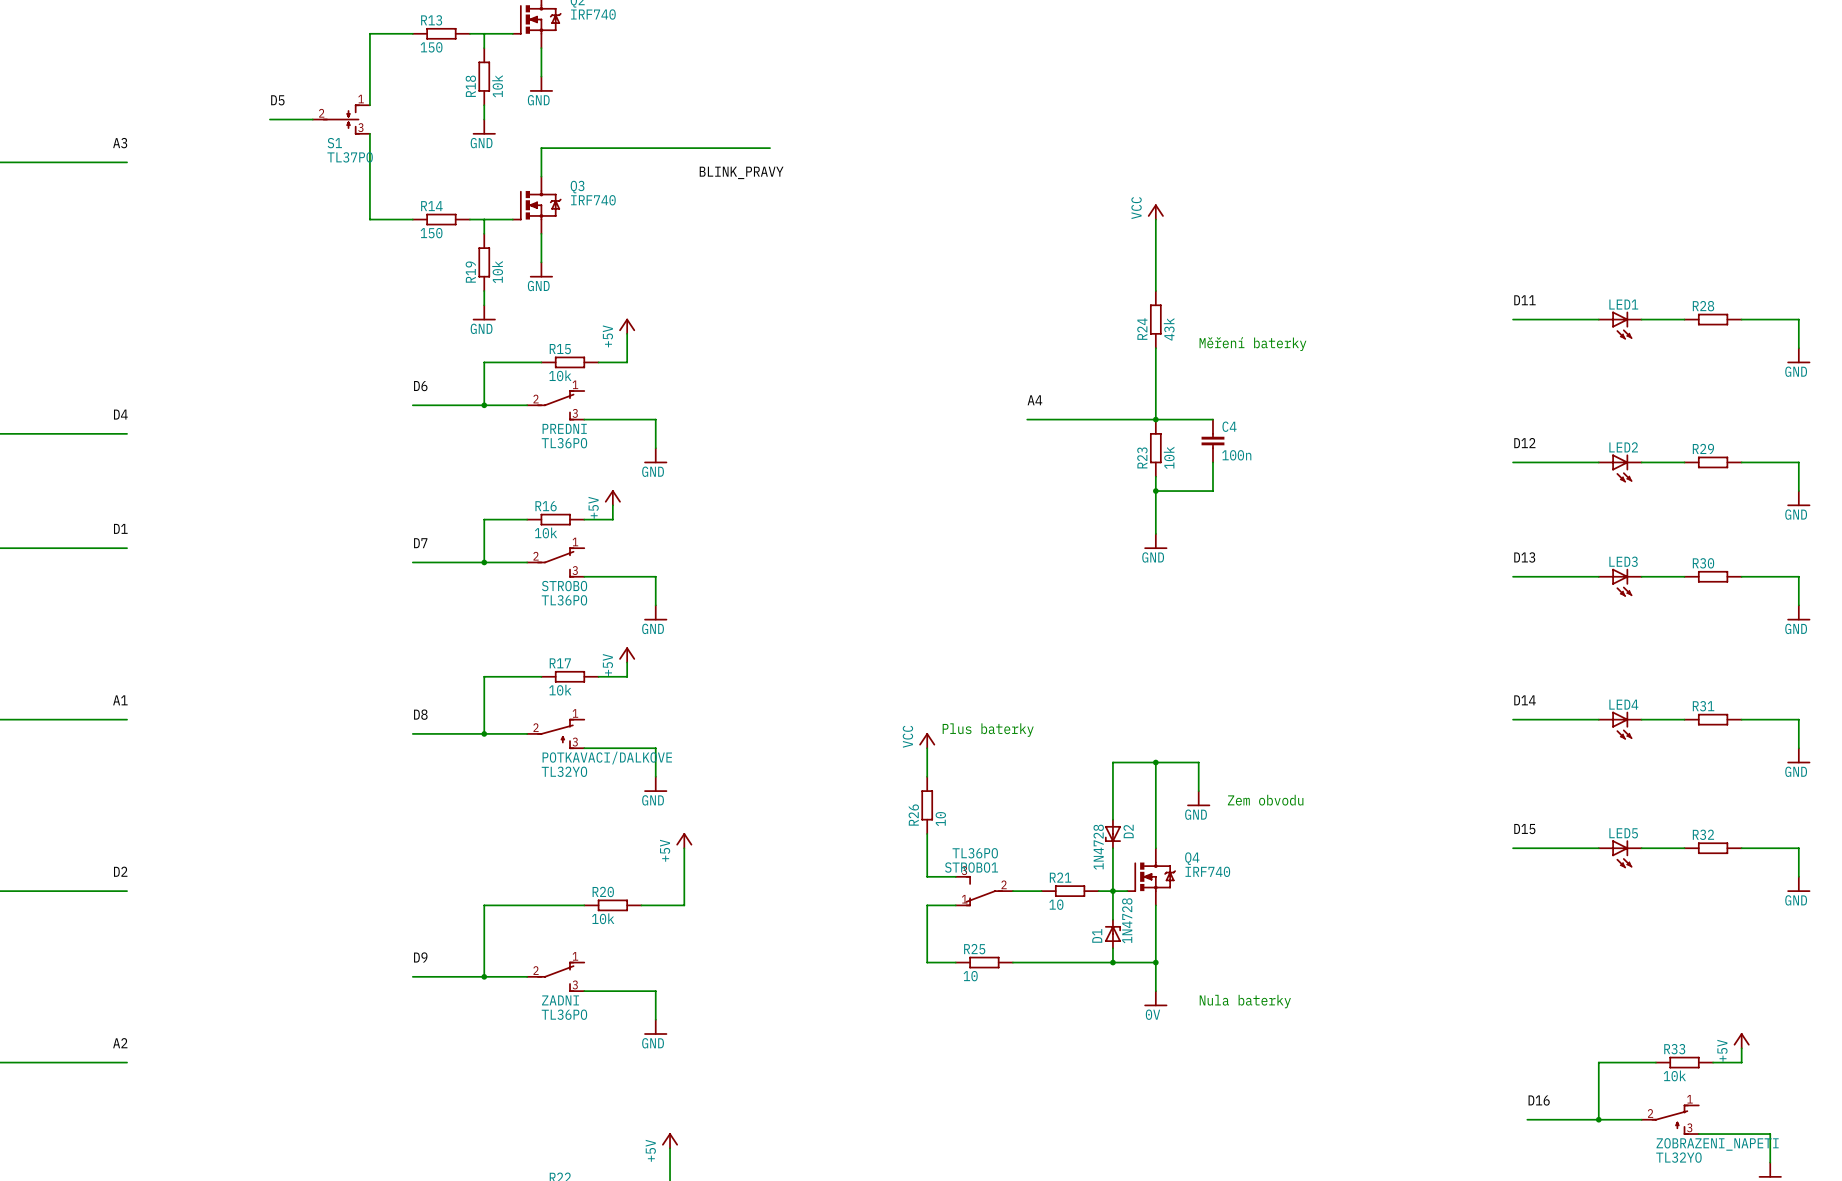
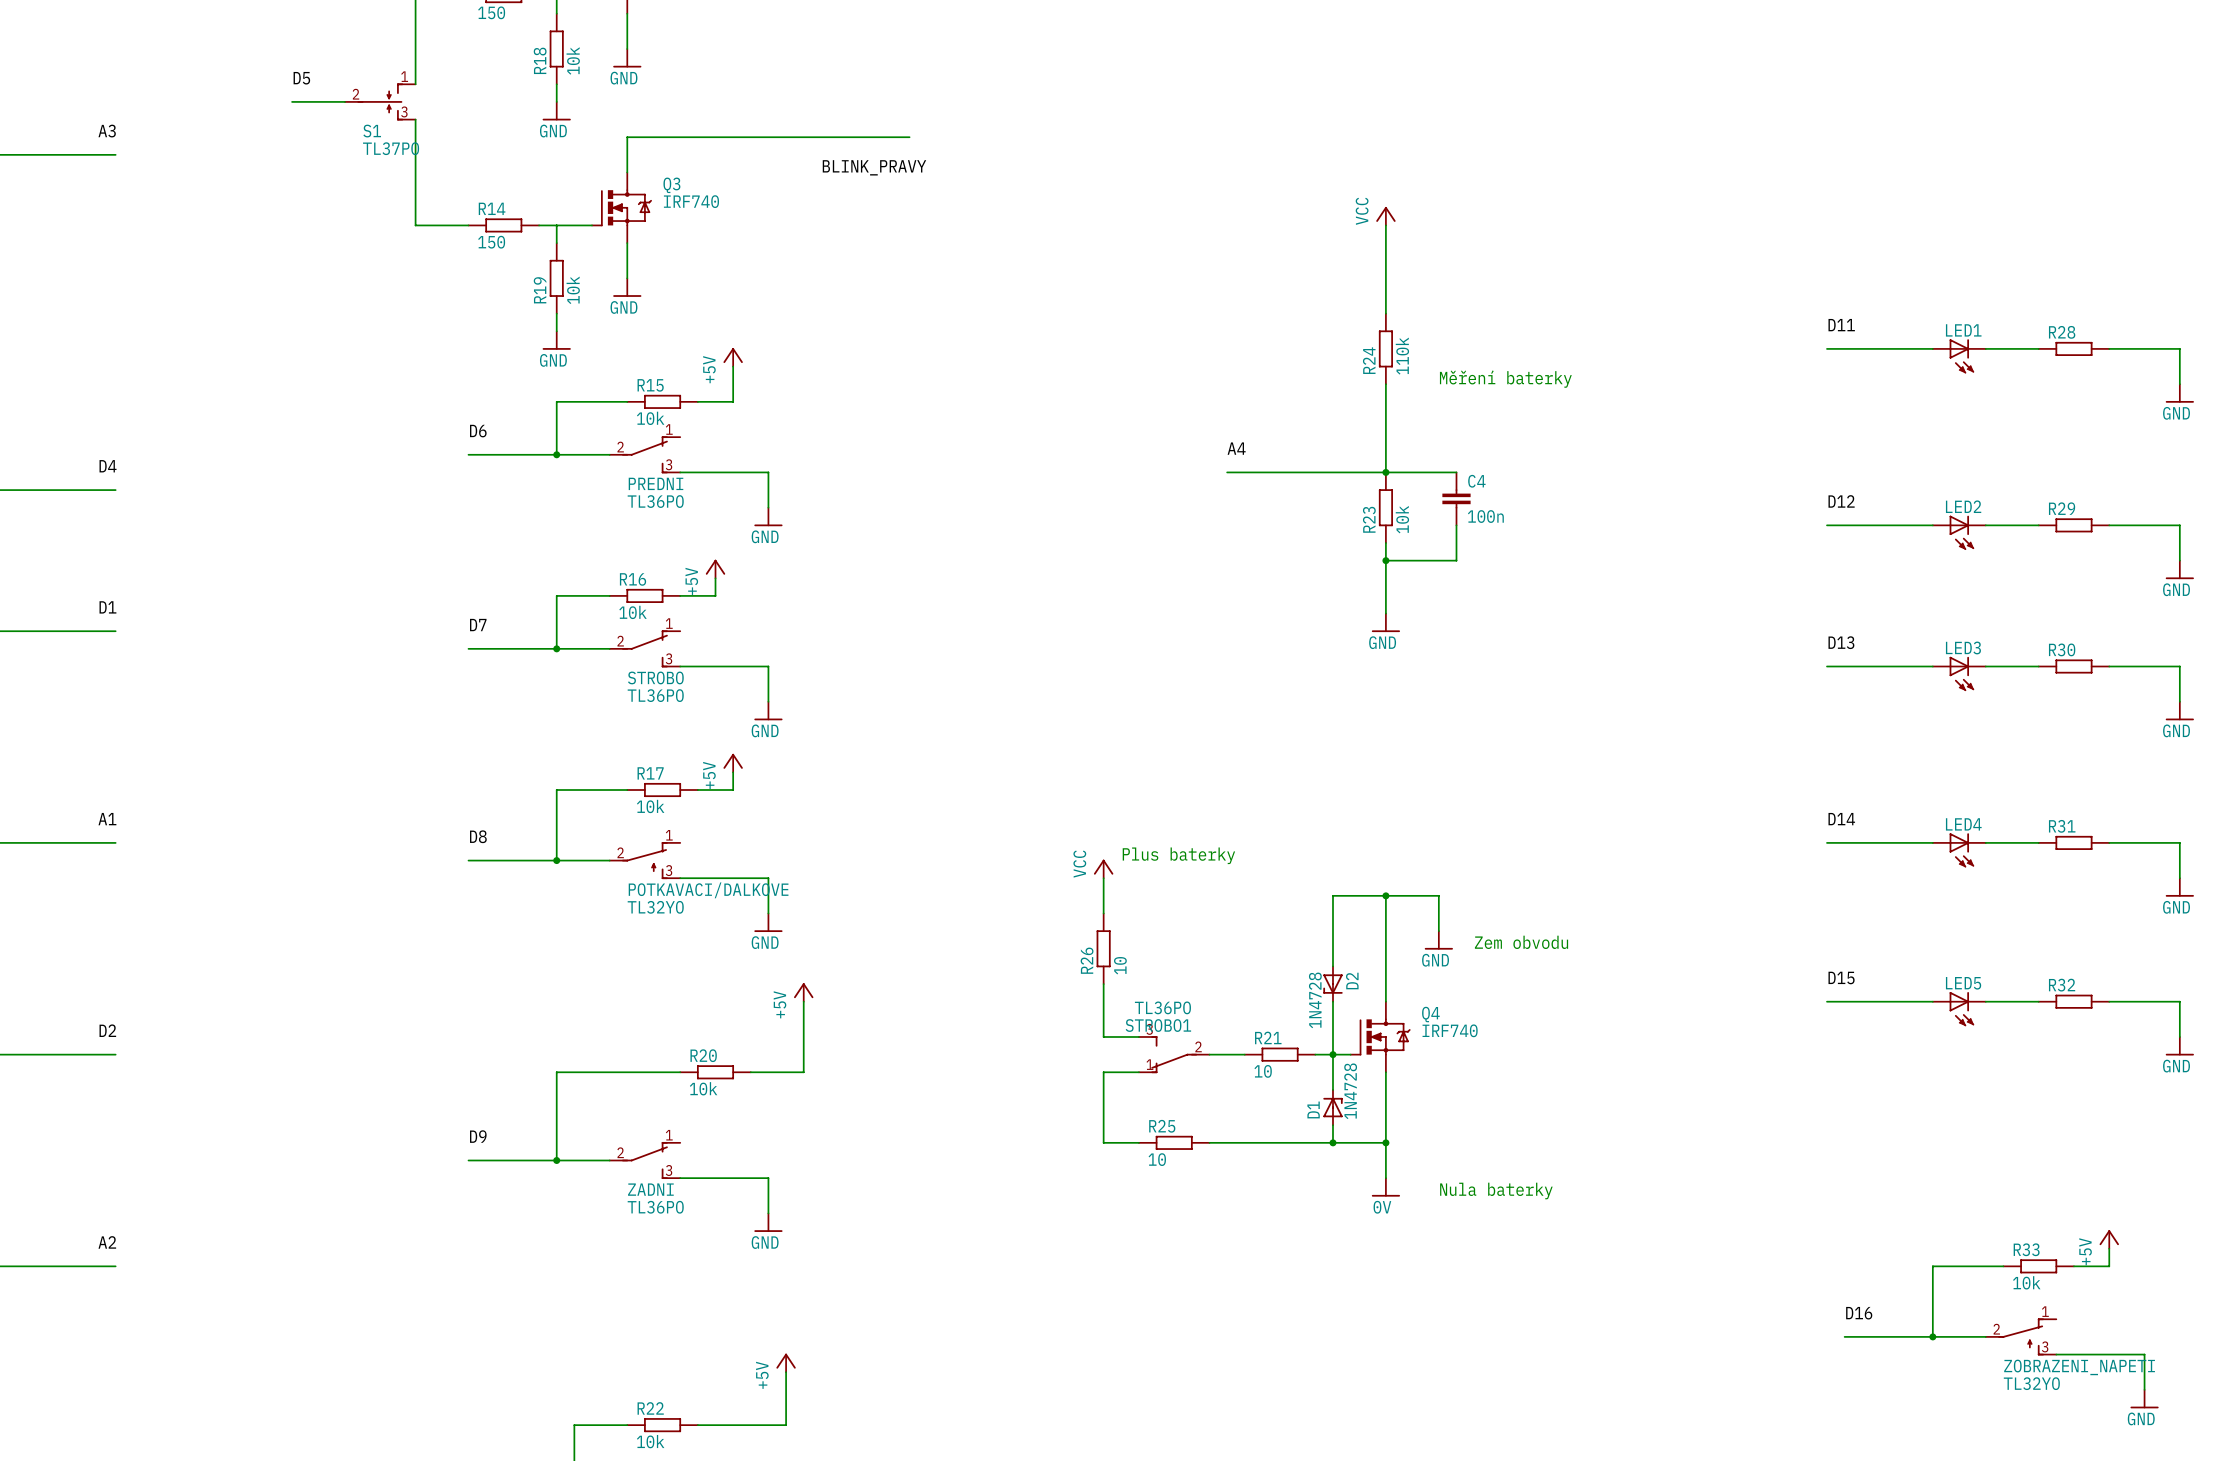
R24 value: 43k (1169, 329) -> 110k (1402, 356)

